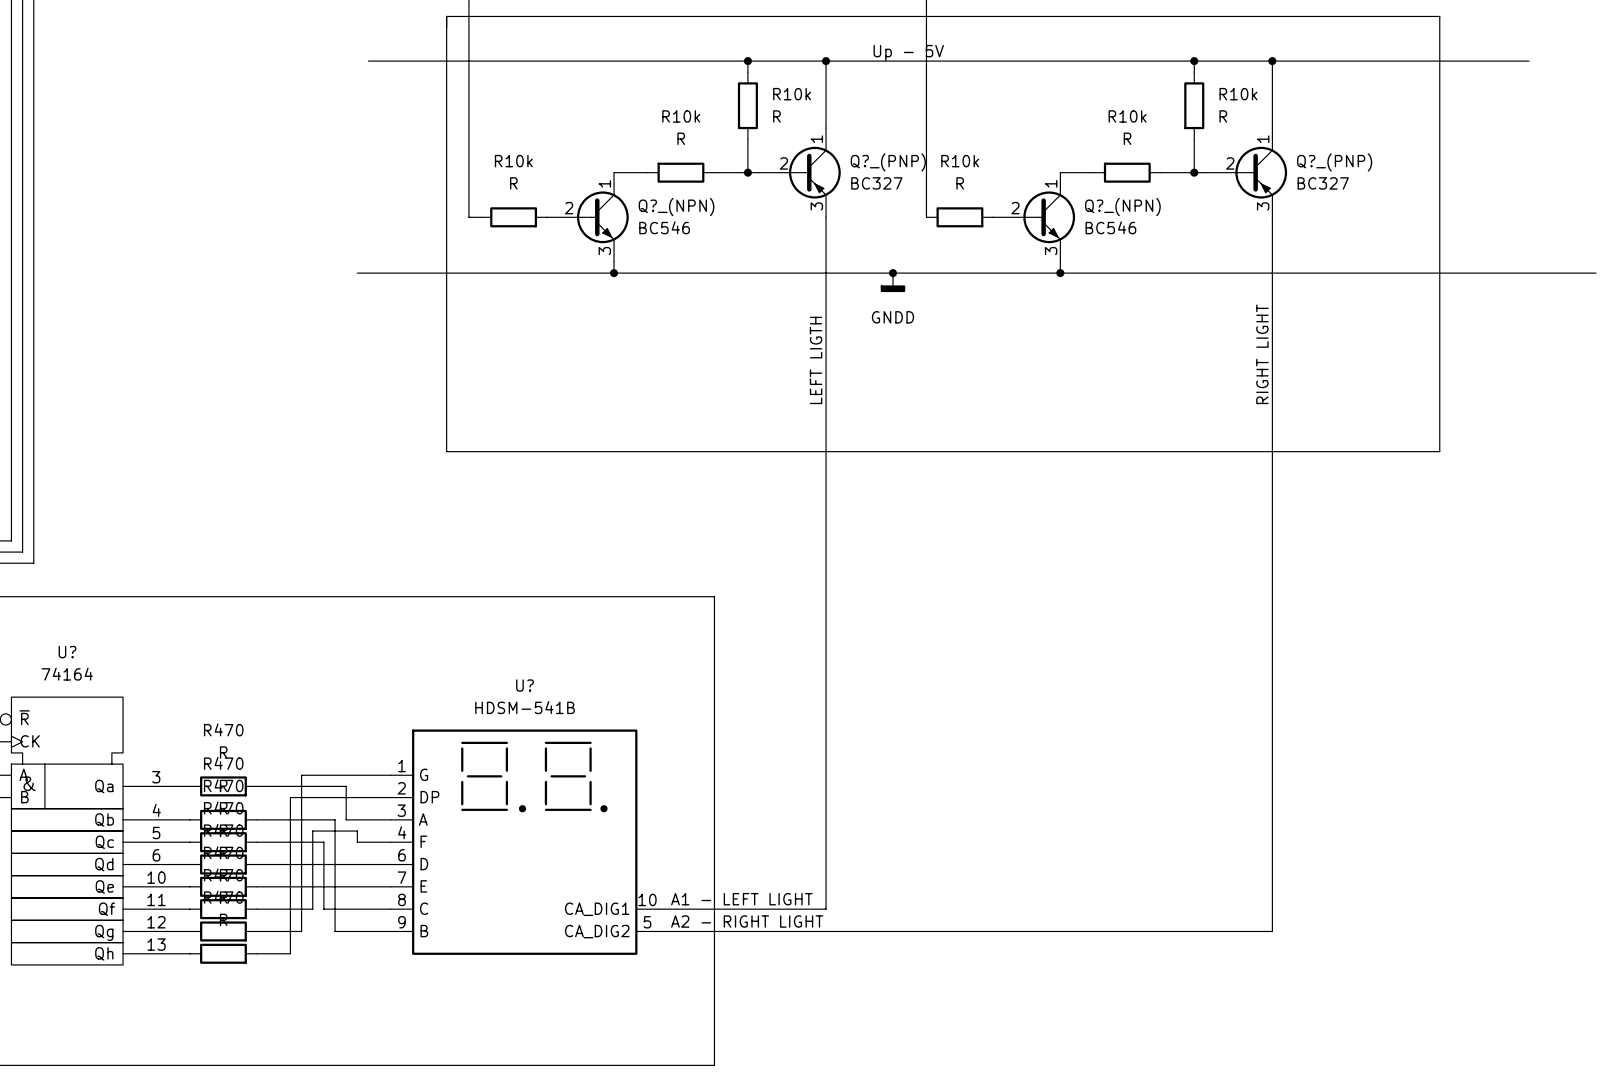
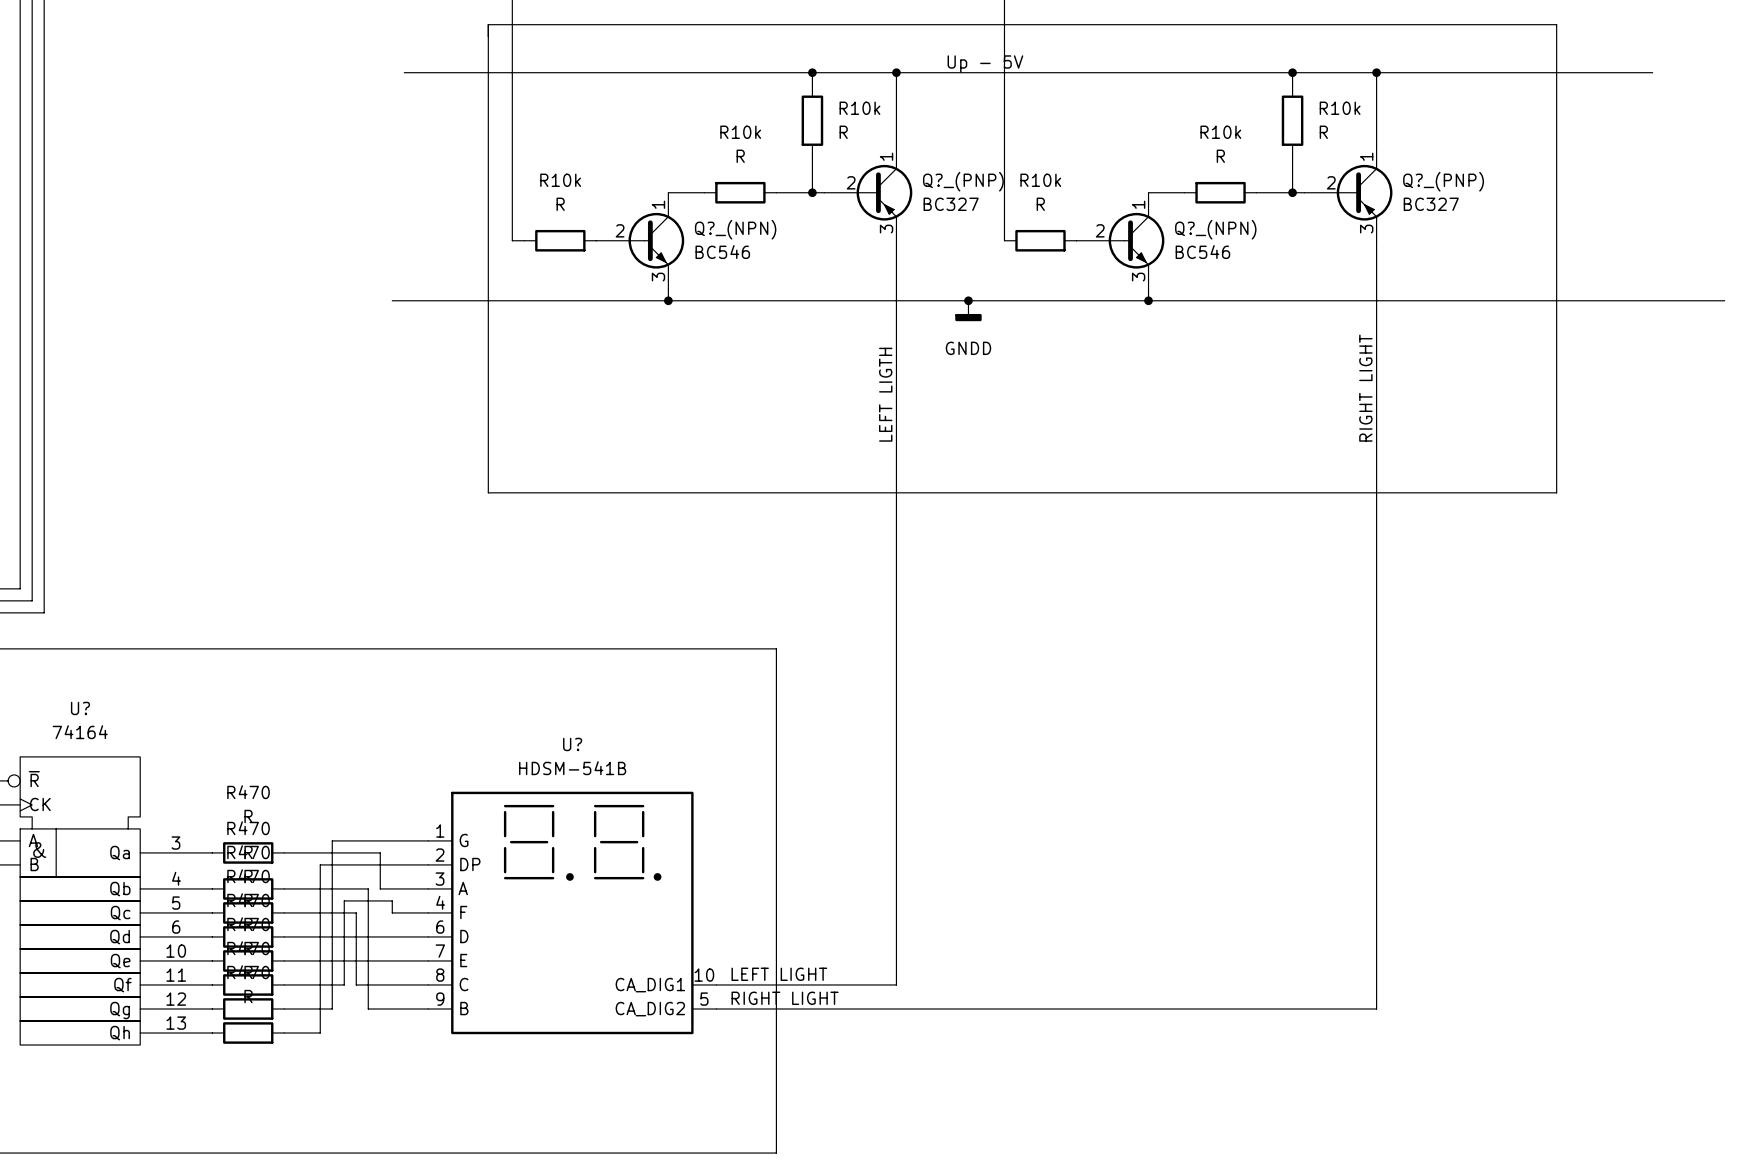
label: A1 - LEFT LIGHT (741, 899) -> LEFT LIGHT (779, 974)
label: A2 - RIGHT LIGHT (747, 921) -> RIGHT LIGHT (785, 998)

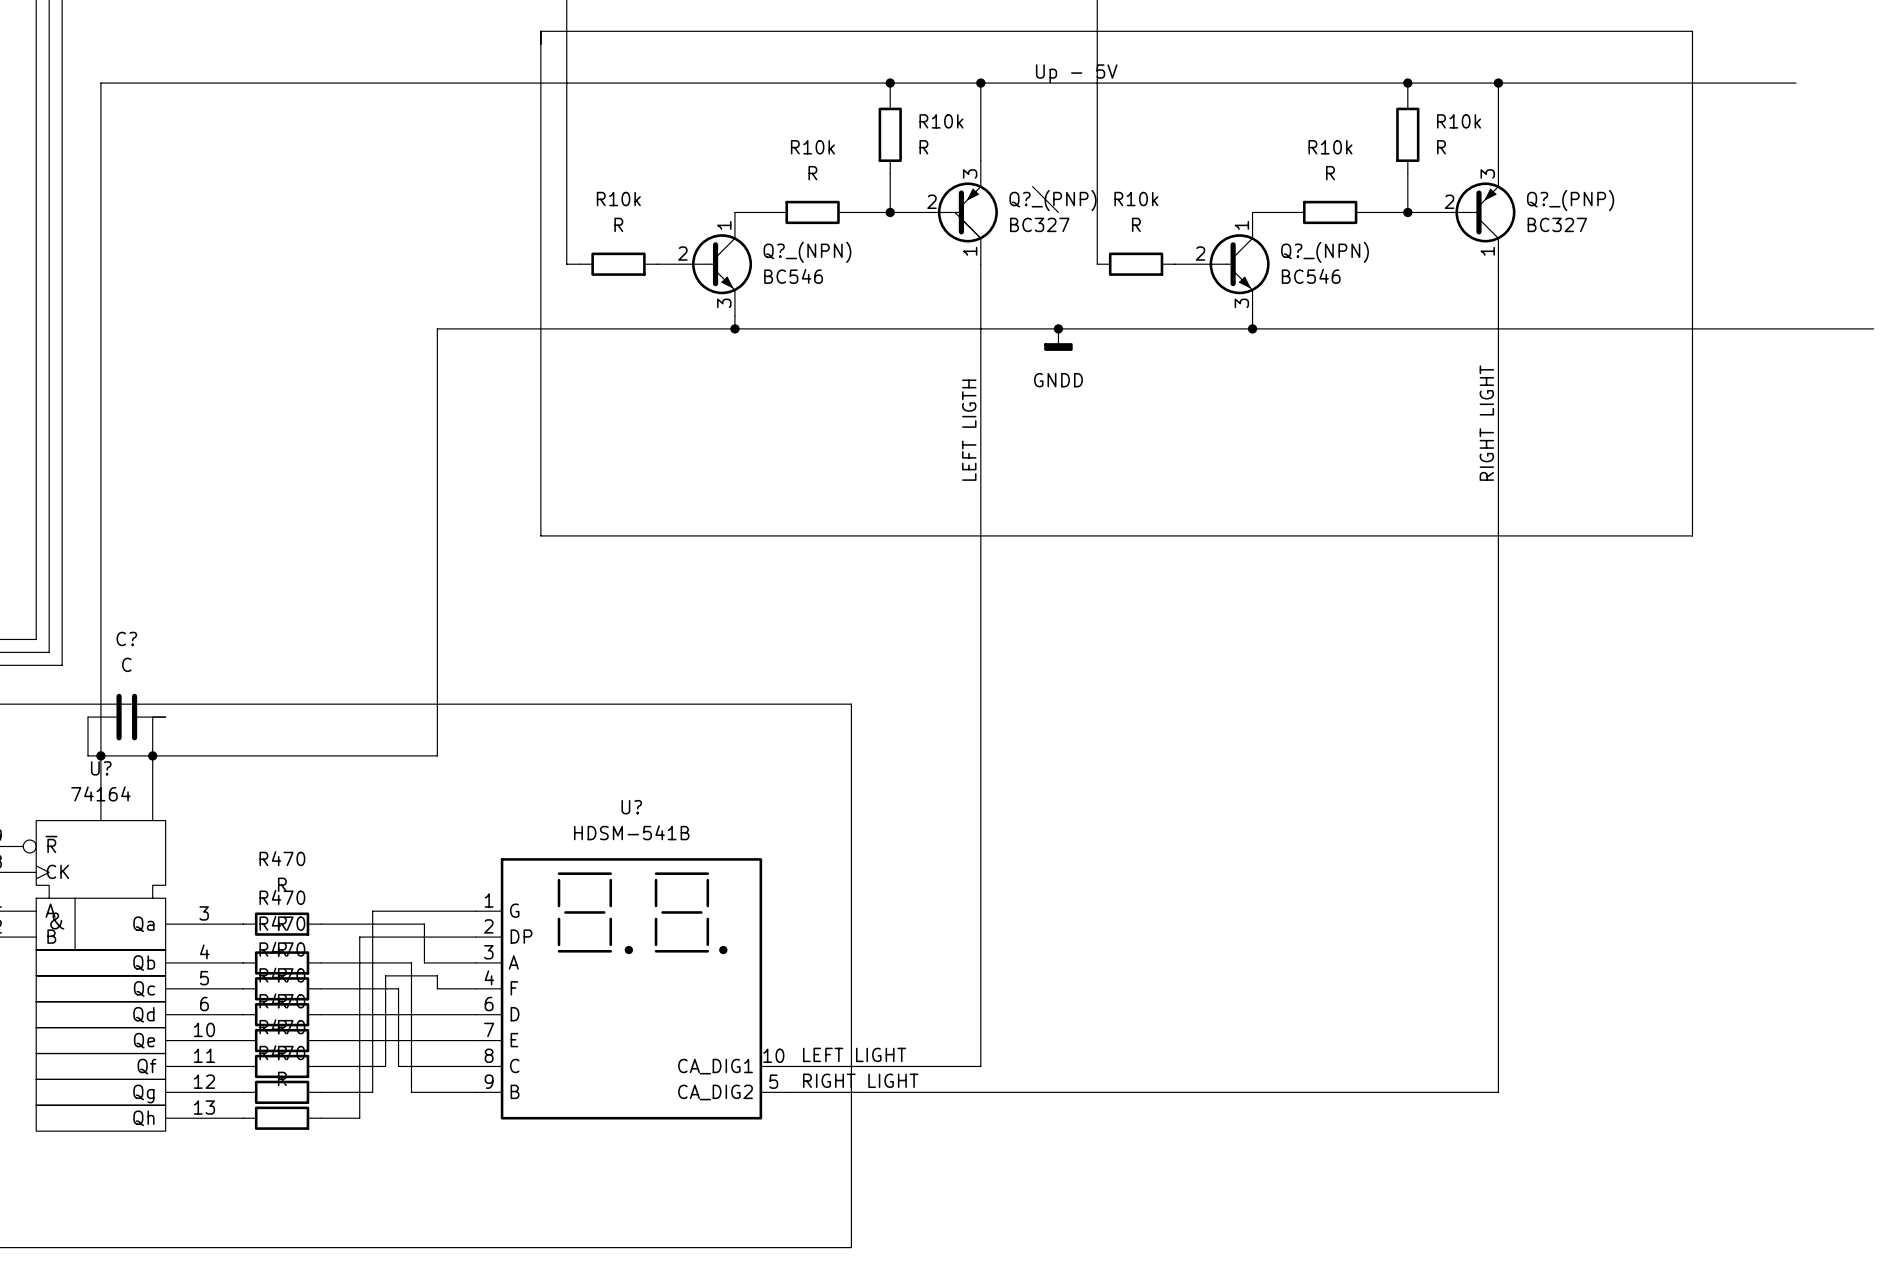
wire: none -> (450, 83) (100, 83) (100, 820)
wire: none -> (1032, 186) (1058, 212)
Q?_(PNP) flip: as is (884, 192) -> up-down (967, 212)
Q?_(PNP) flip: as is (1364, 192) -> up-down (1485, 212)
wire: none -> (437, 328) (437, 755) (87, 755) (87, 717)
C?: none -> C (126, 717)
wire: none -> (165, 717) (152, 717) (152, 820)
junction: none -> (100, 755)
junction: none -> (152, 755)

